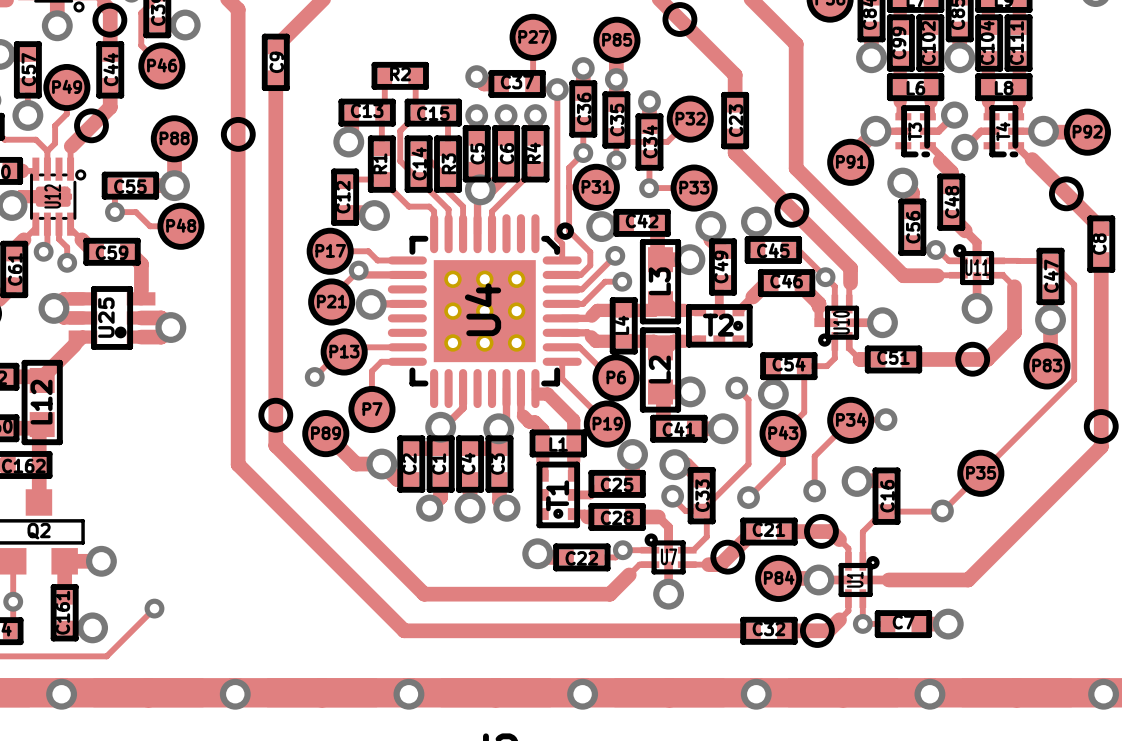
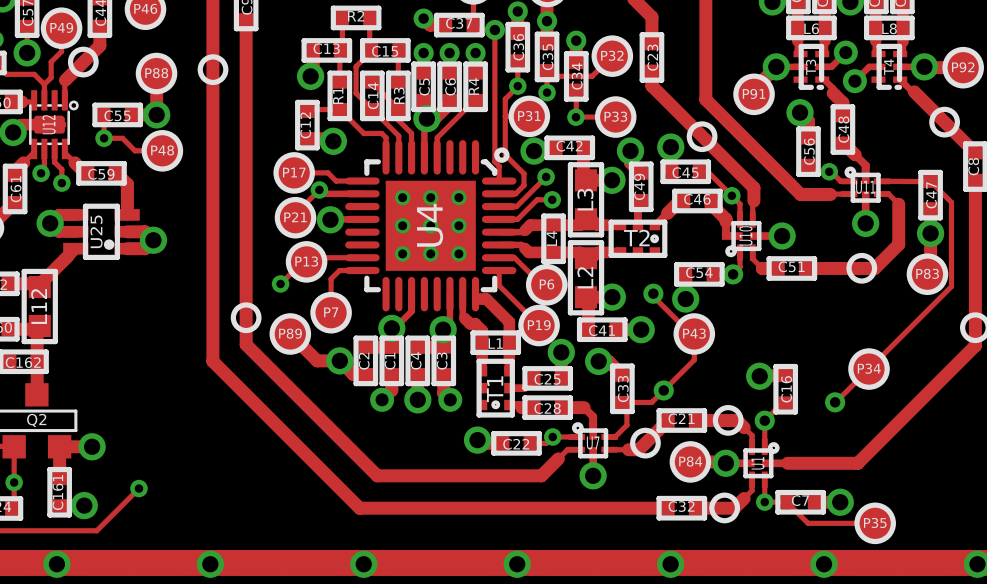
track: (804, 366) (804, 412) (783, 433) -> (653, 293) (653, 296) (690, 333) (694, 333)
via: none -> (733, 274)
track: (736, 388) (748, 399) (748, 464) (701, 511) (685, 511) (672, 496) -> none
track: (885, 419) (851, 419) (814, 456) (814, 490) -> none
via: (885, 419) -> none
P34: (850, 420) -> none
P35 name: P35 (981, 472) -> P34 (869, 368)
via: (814, 490) -> none
via: (672, 496) -> none
track: none -> (663, 390) (651, 402) (622, 402)
track: (886, 511) (942, 511) -> none
via: none -> (764, 420)
track: none -> (786, 502) (808, 523) (875, 523)
P35: none -> (875, 523)

